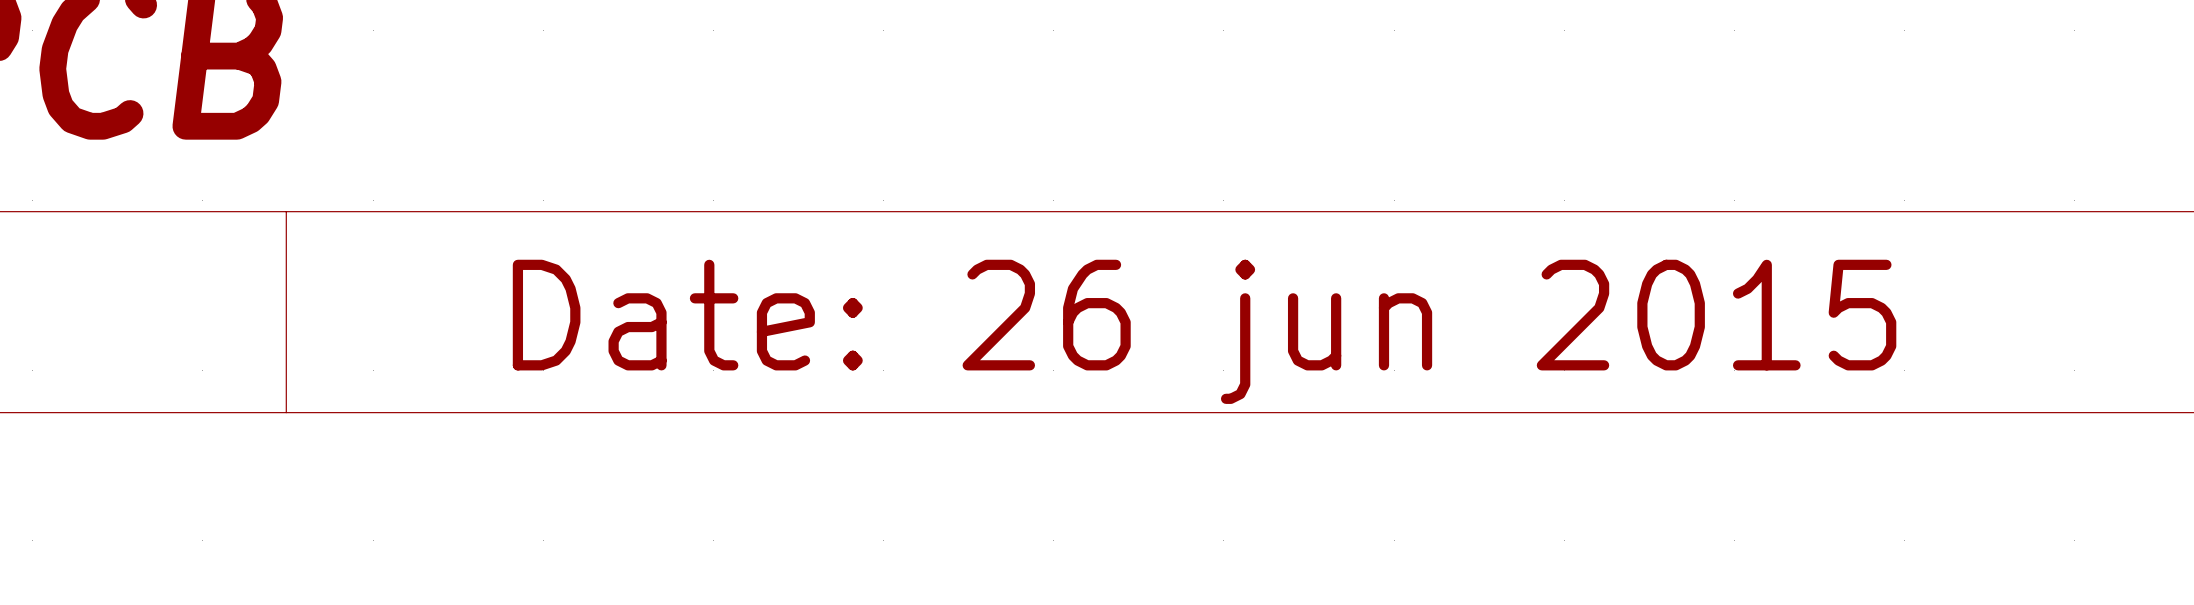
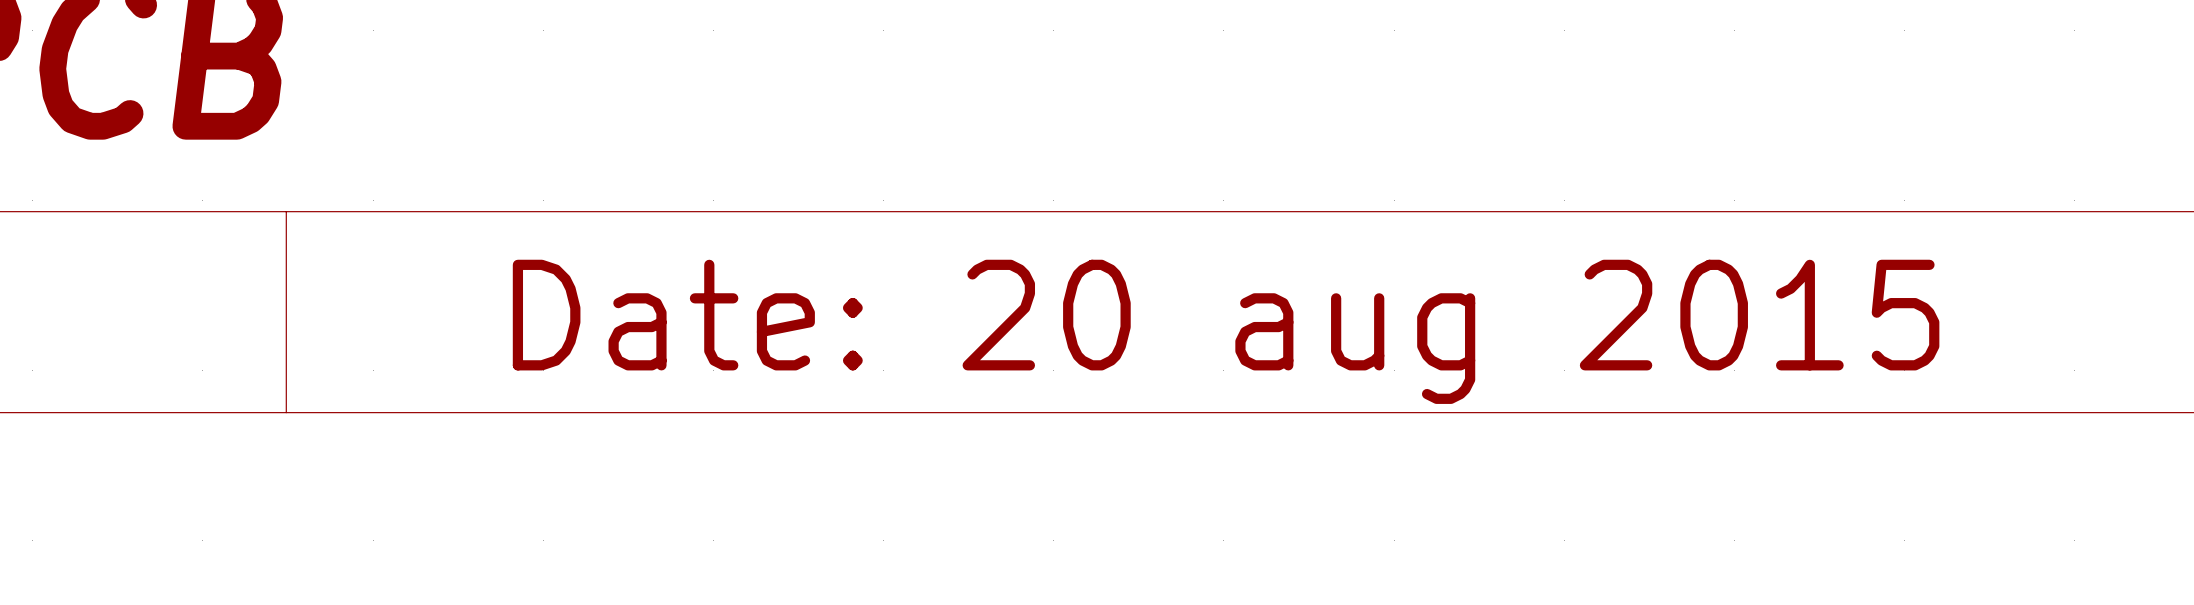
title block: Date: 26 jun 2015 (1204, 331) -> Date: 20 aug 2015 (1226, 331)

